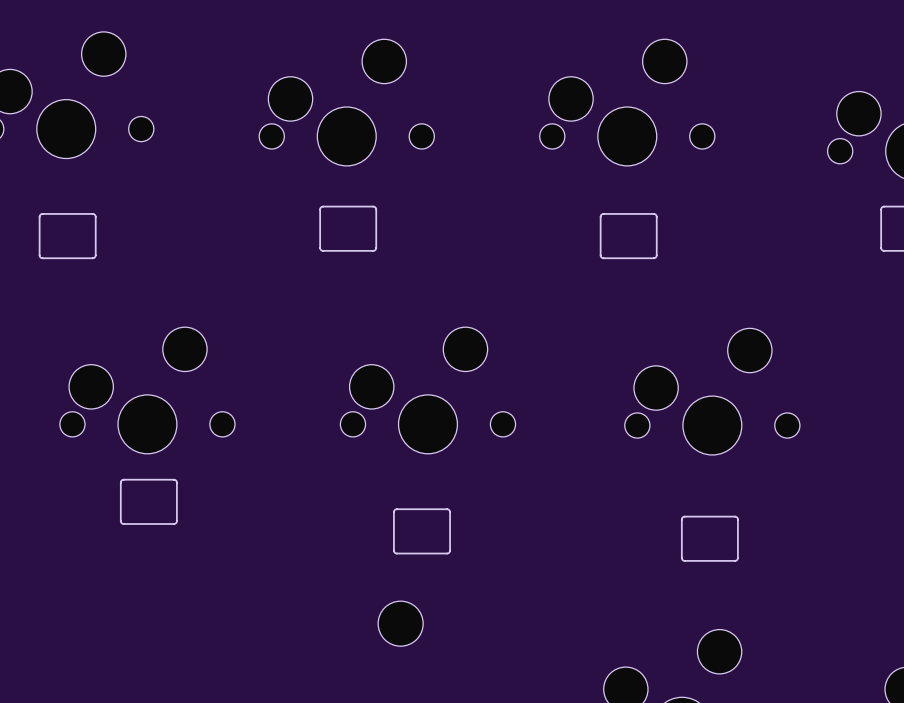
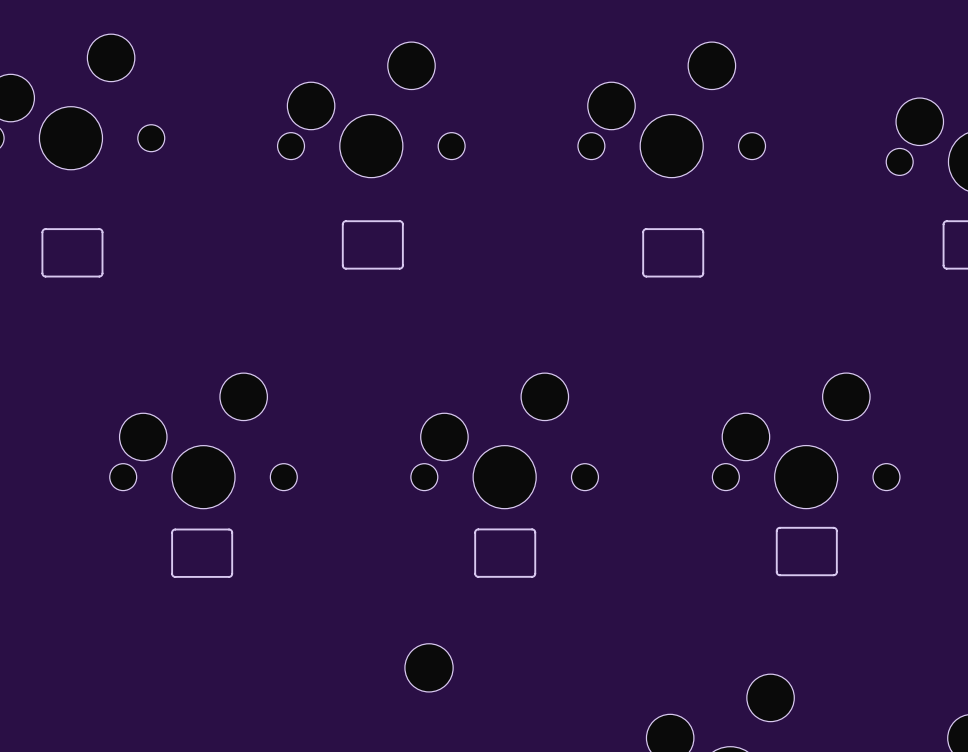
part position: (147, 390) -> (203, 440)
part position: (427, 390) -> (504, 440)
part position: (712, 391) -> (806, 440)
part position: (148, 501) -> (202, 553)
part position: (421, 531) -> (505, 553)
part position: (709, 538) -> (806, 551)

